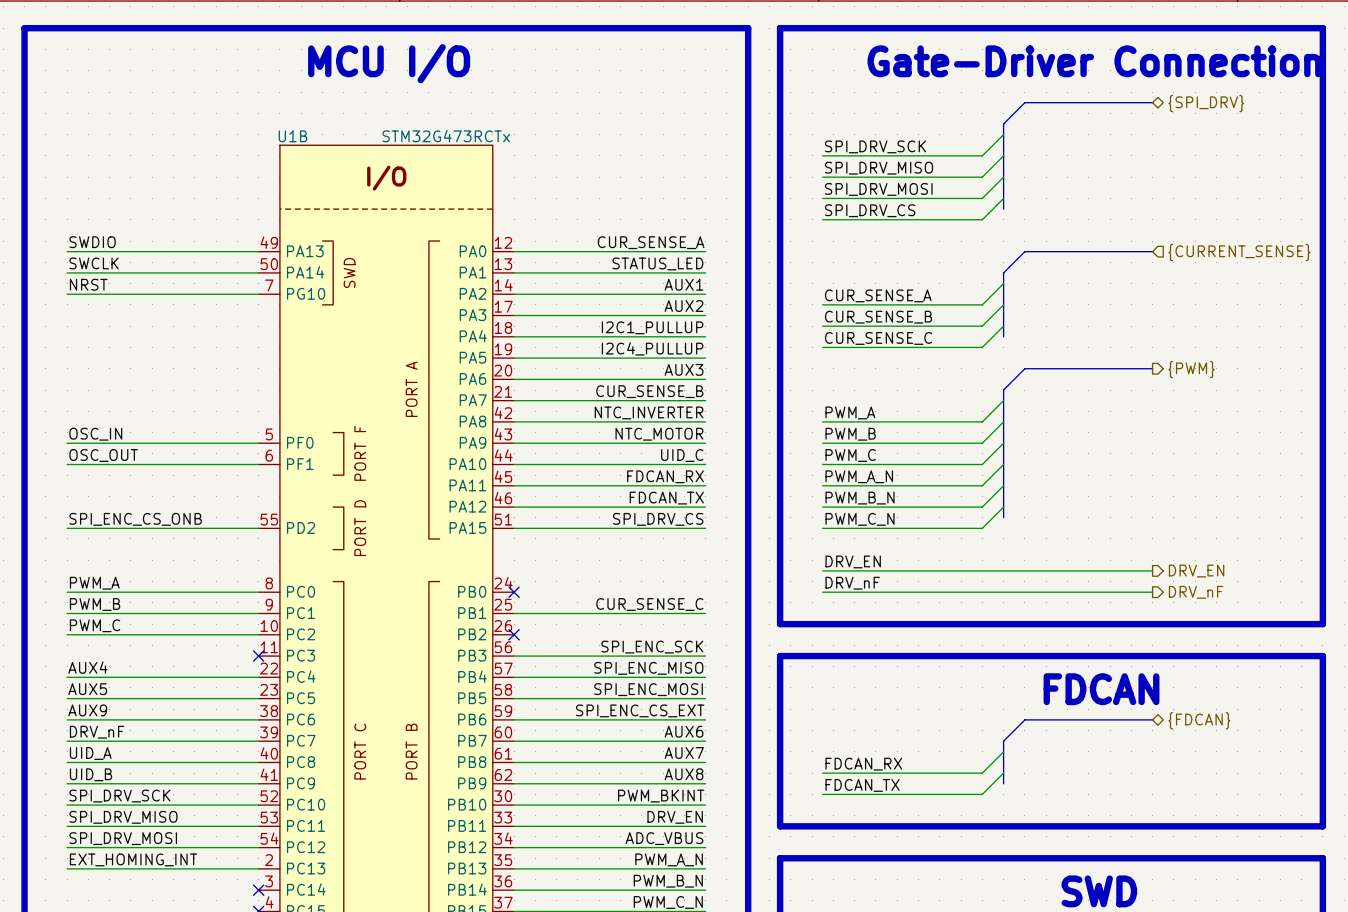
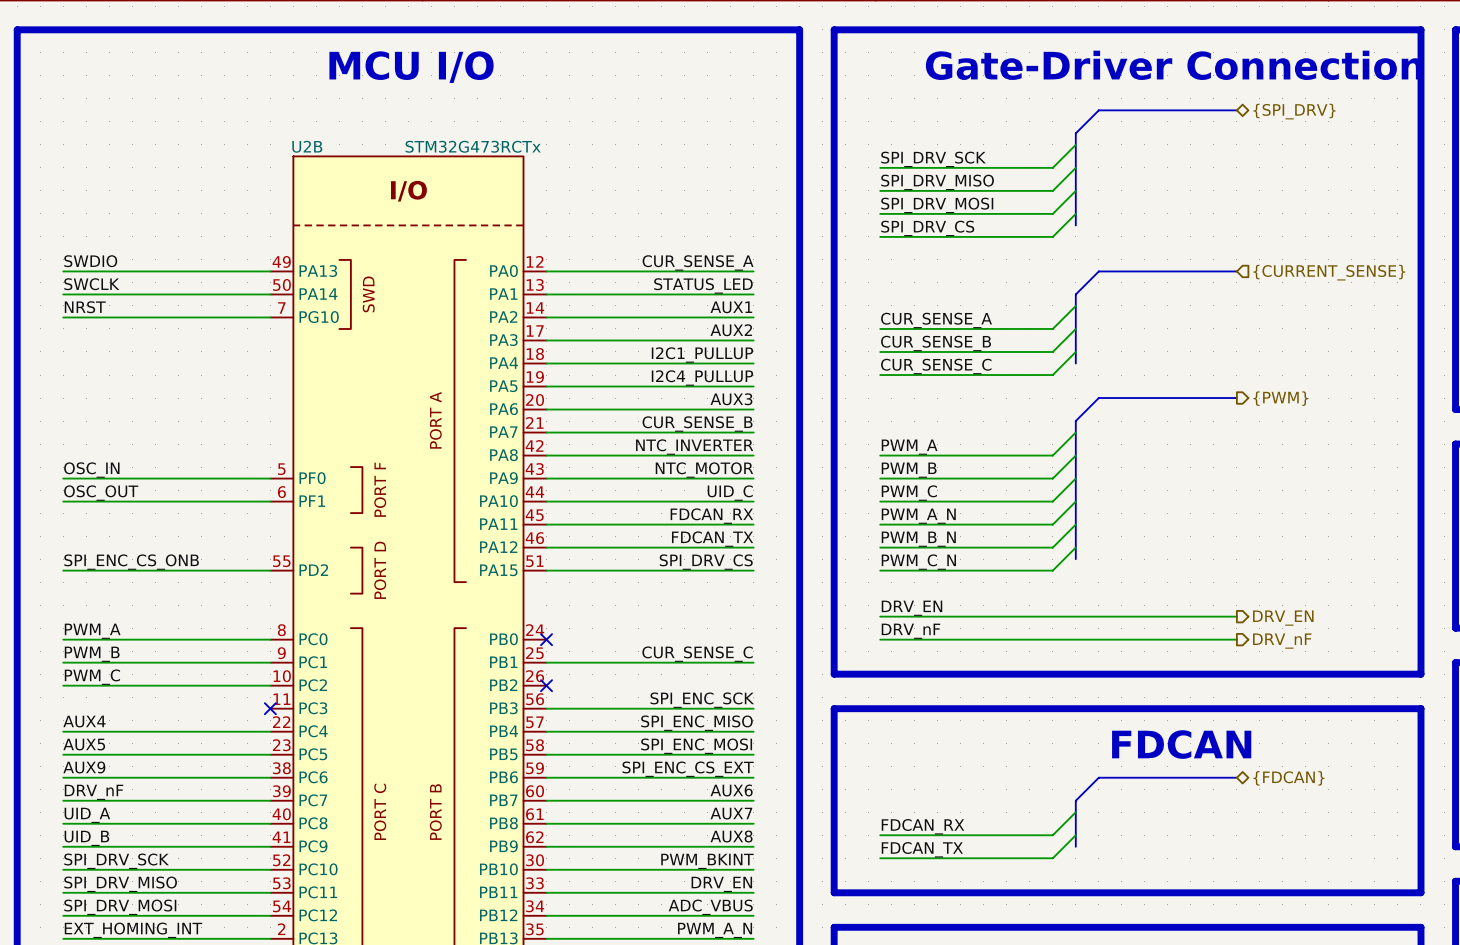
U1B name: U1B (292, 136) -> U2B (307, 146)

